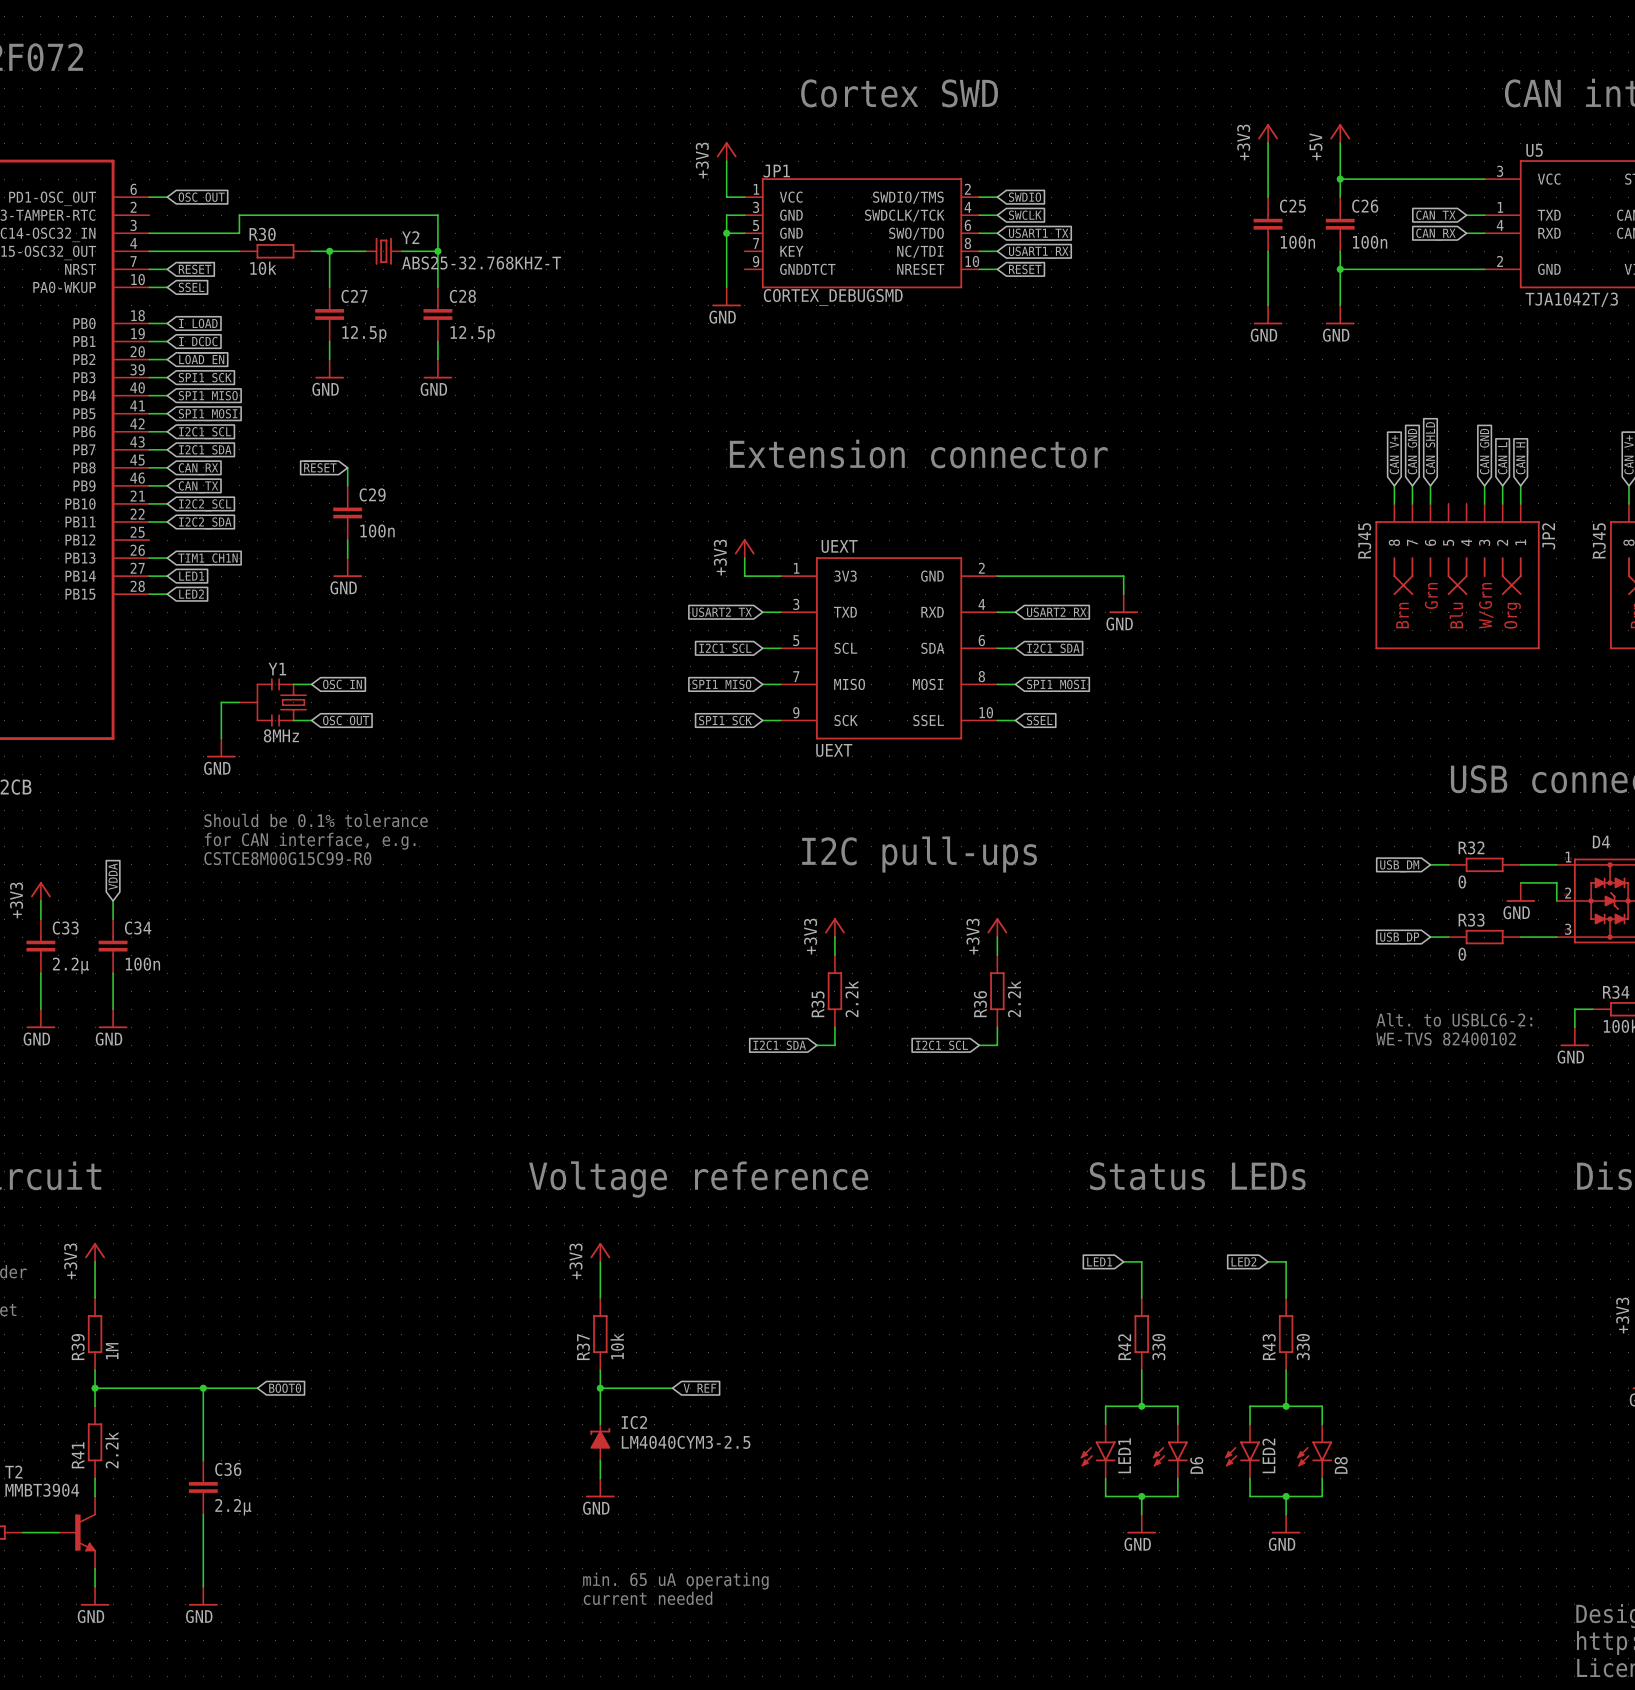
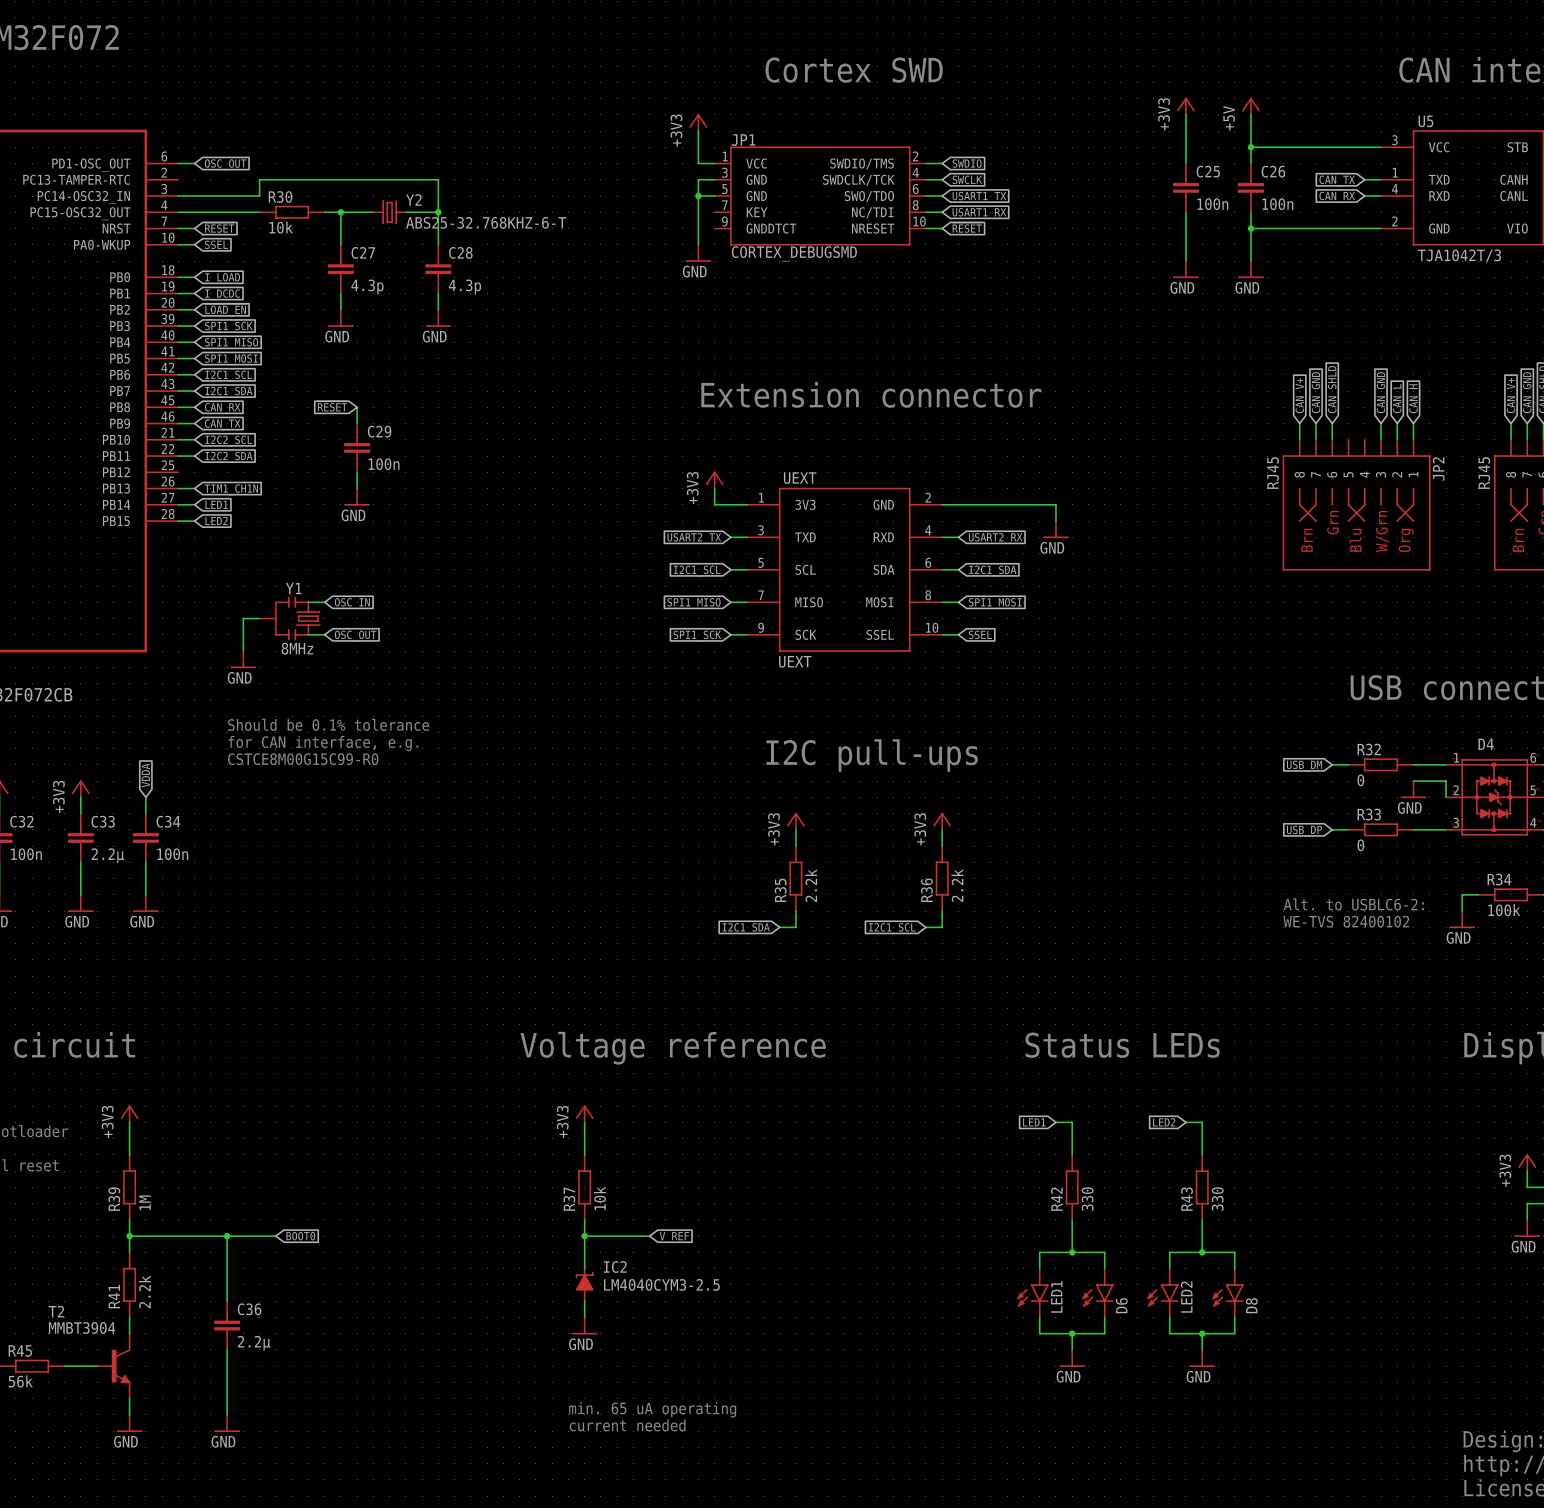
Y2 value: ABS25-32.768KHZ-T (481, 263) -> ABS25-32.768KHZ-6-T (486, 222)
C27 value: 12.5p (364, 334) -> 4.3p (367, 286)
C28 value: 12.5p (472, 334) -> 4.3p (464, 286)

